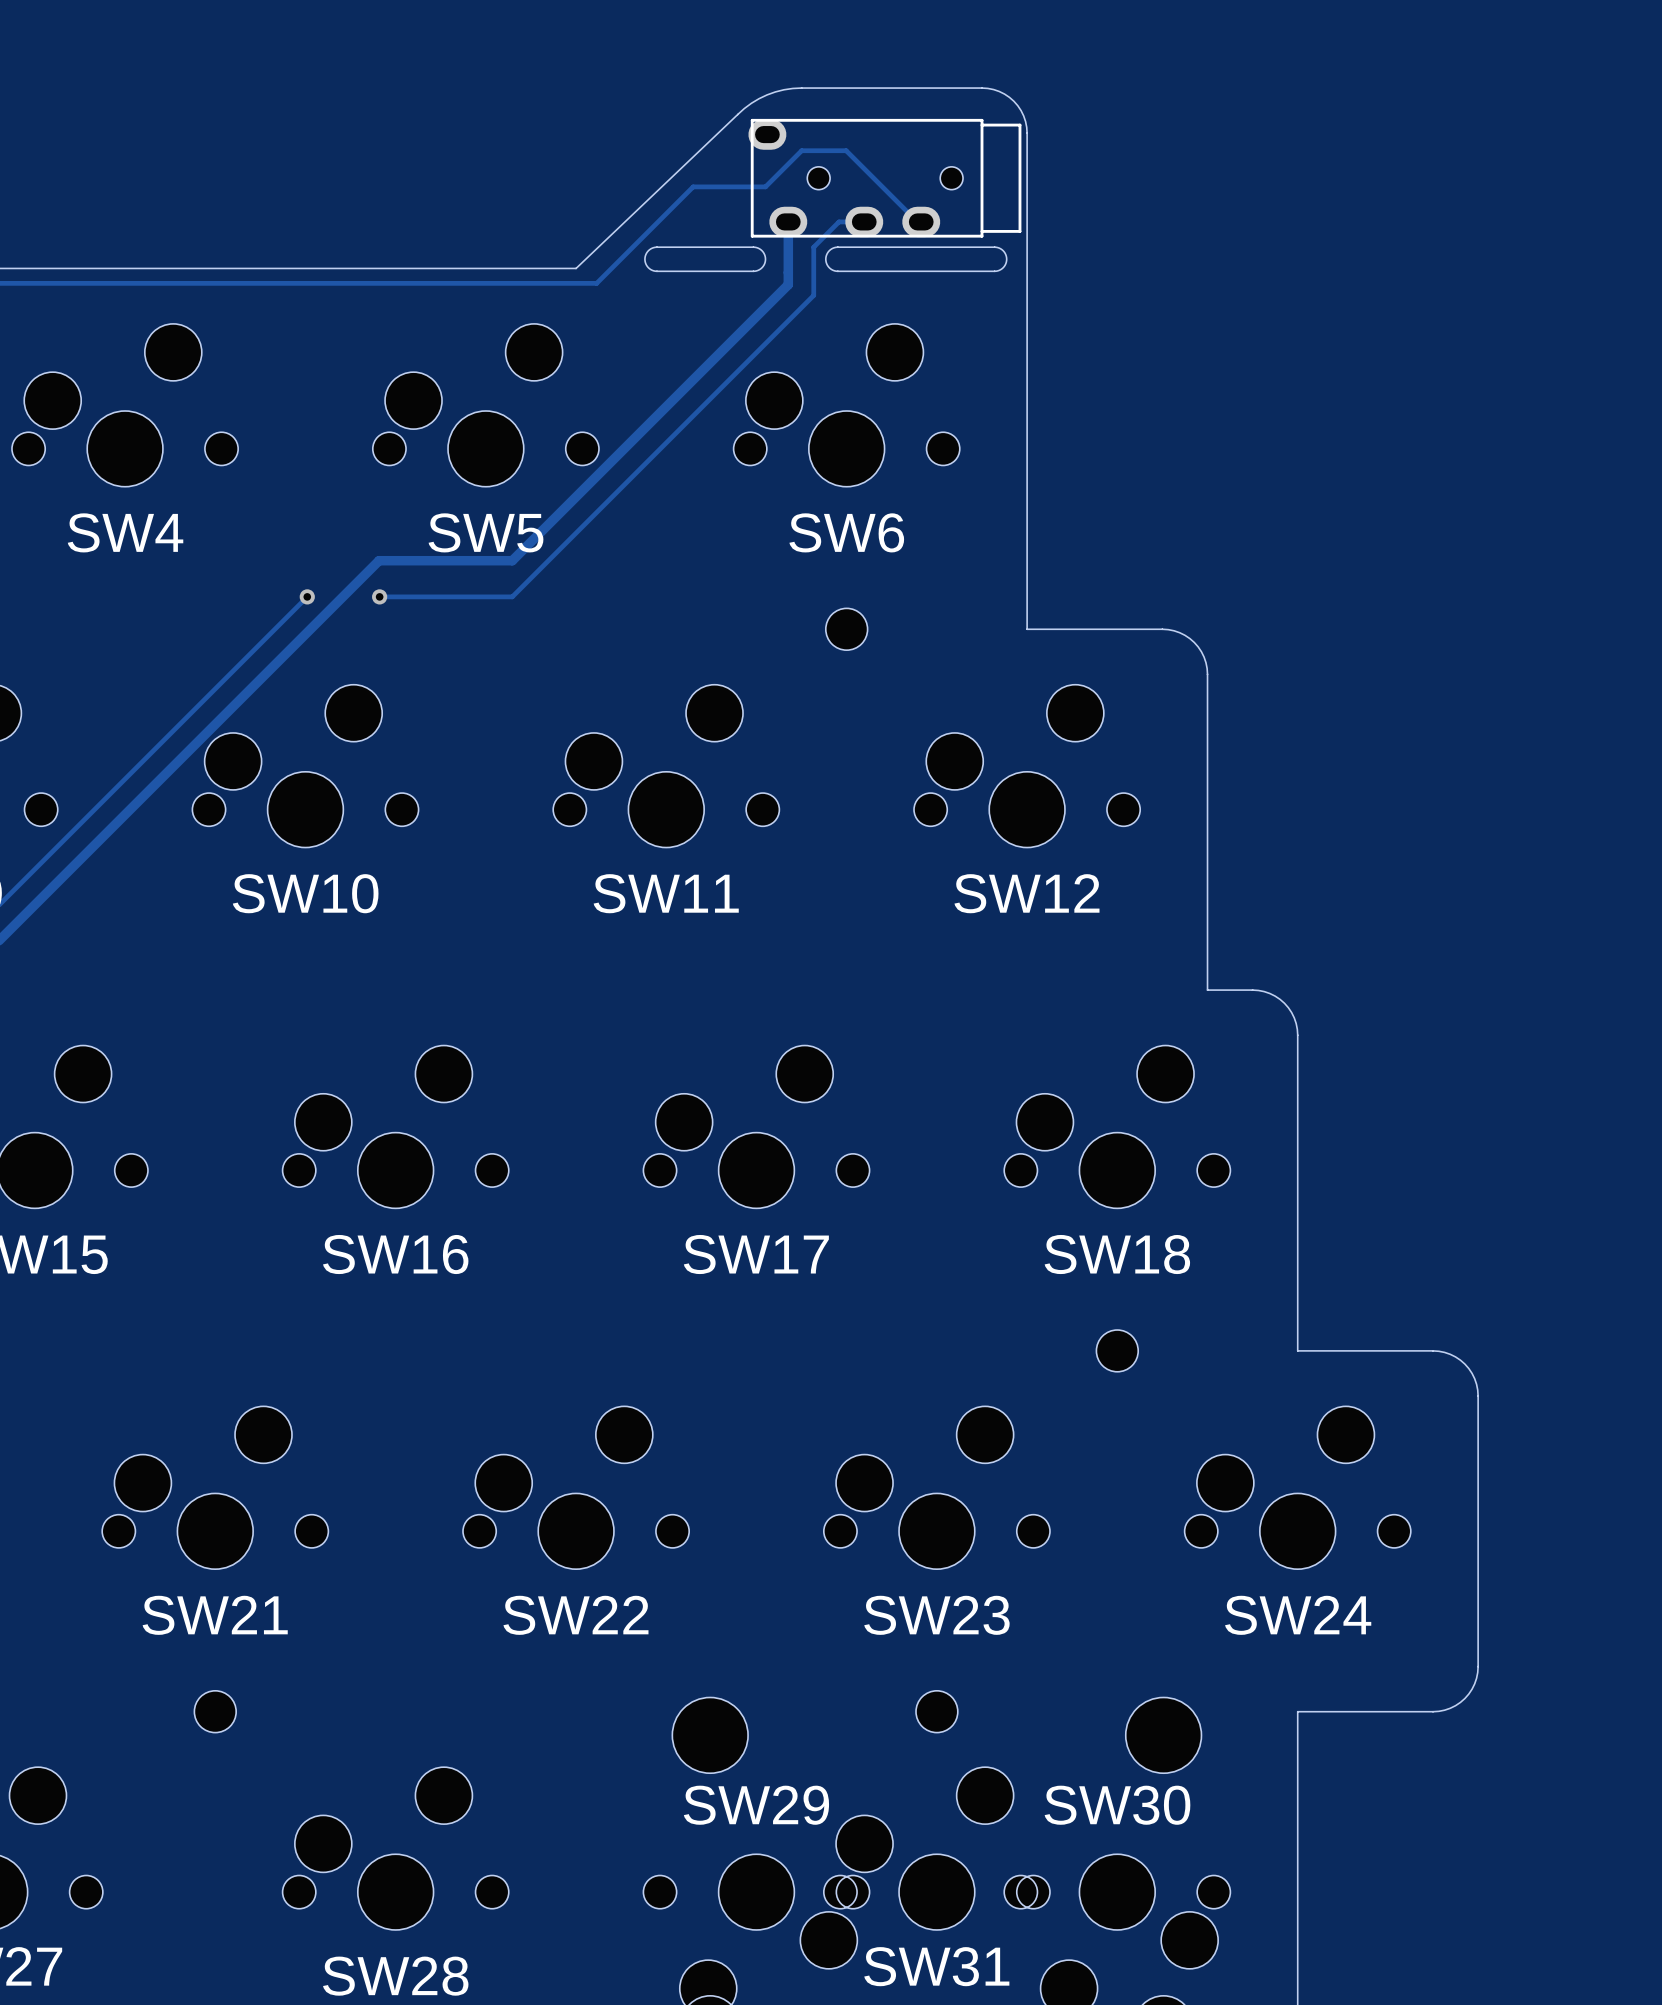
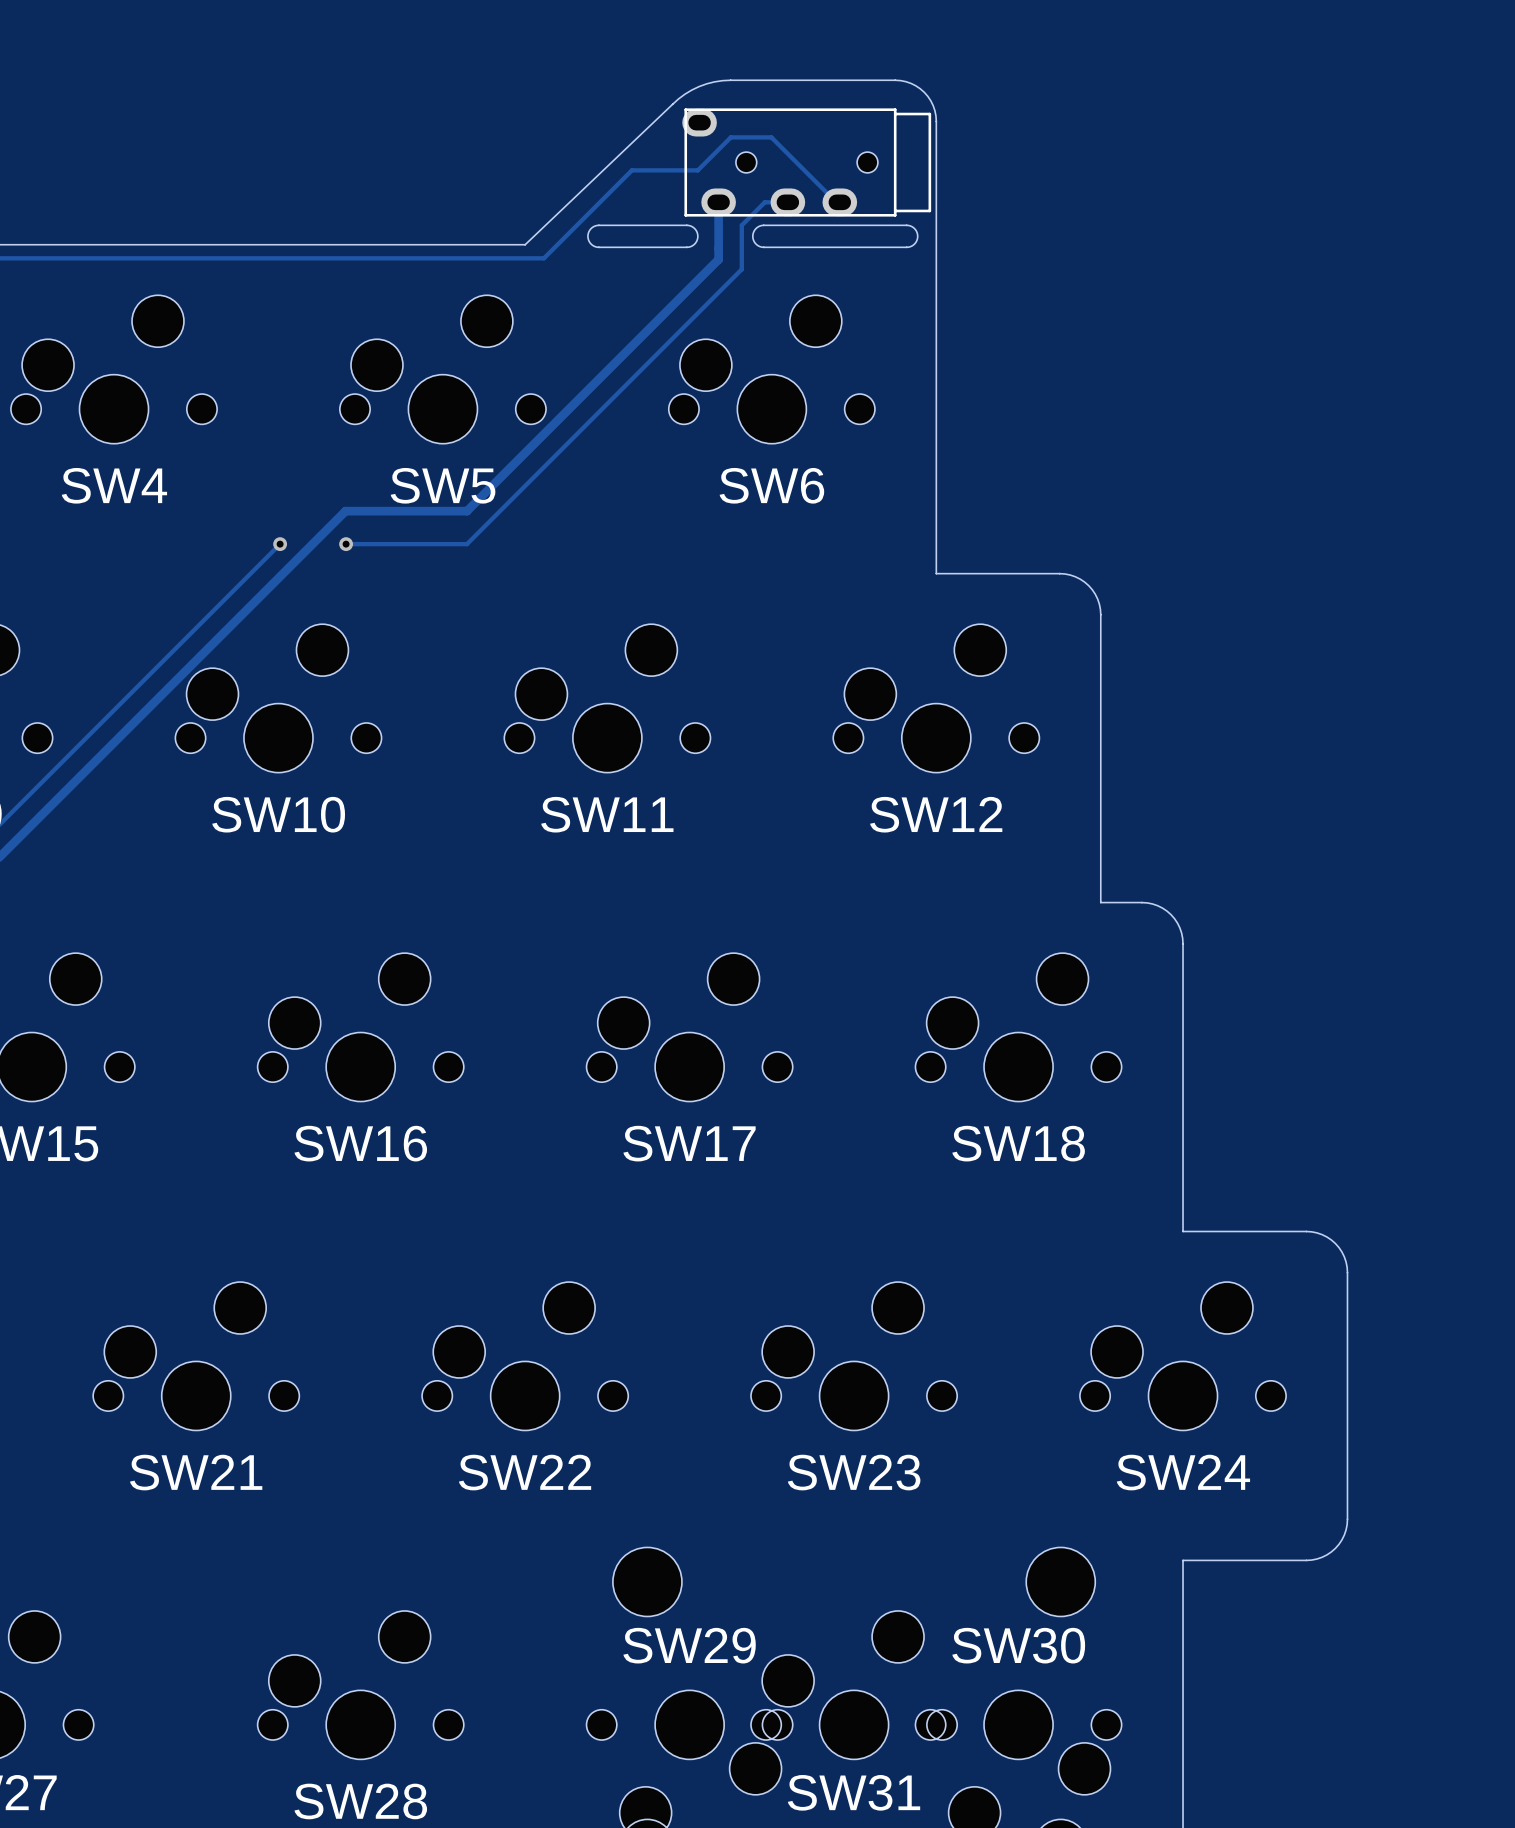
part: (846, 629) -> none
part: (1117, 1350) -> none
part: (215, 1711) -> none
part: (936, 1711) -> none

